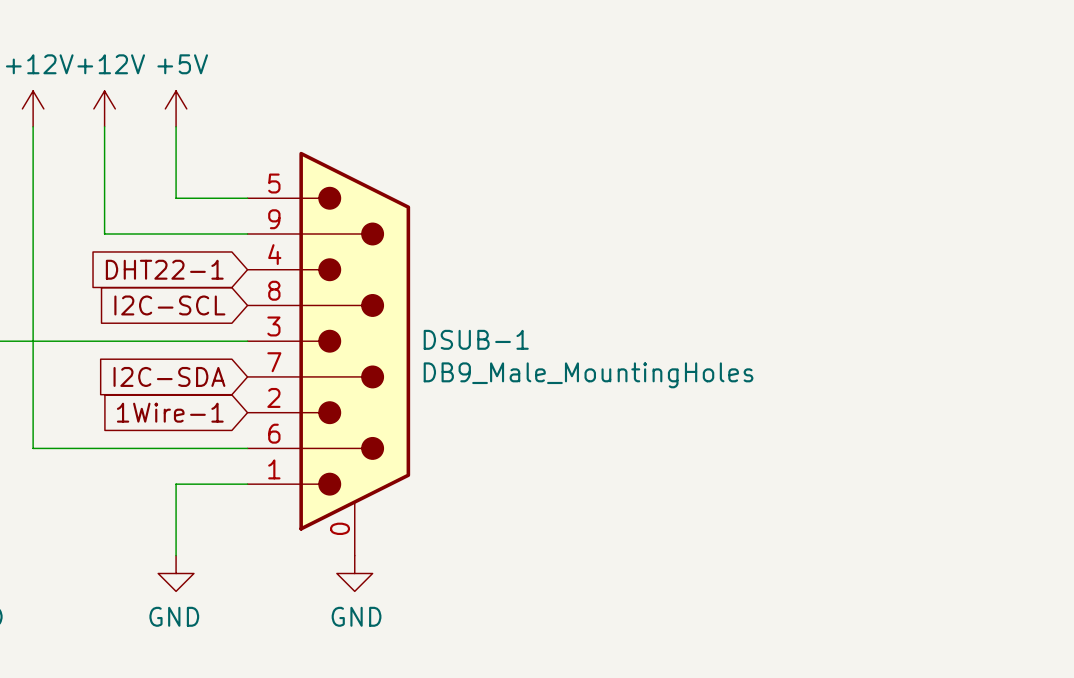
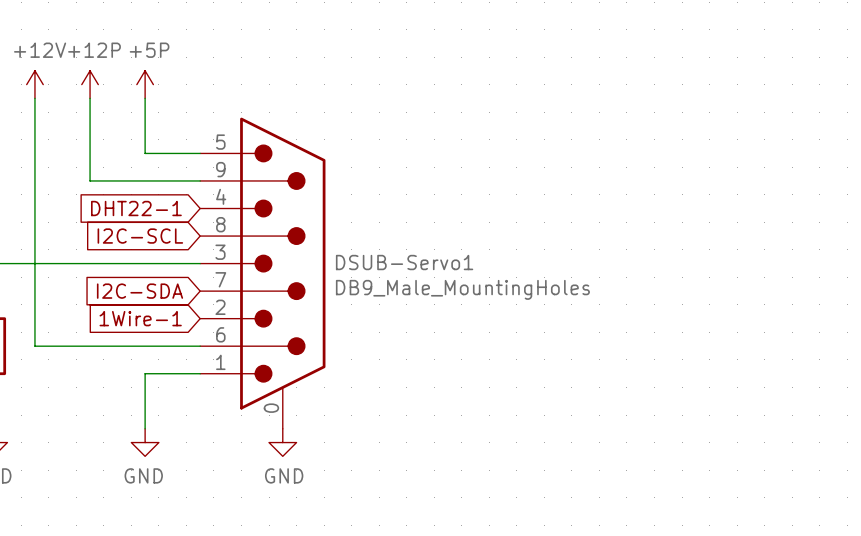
power symbol: +12V (104, 108) -> +12P (90, 84)
power symbol: +5V (176, 108) -> +5P (145, 84)
DSUB-1 name: DSUB-1 (476, 339) -> DSUB-Servo1 (404, 262)

